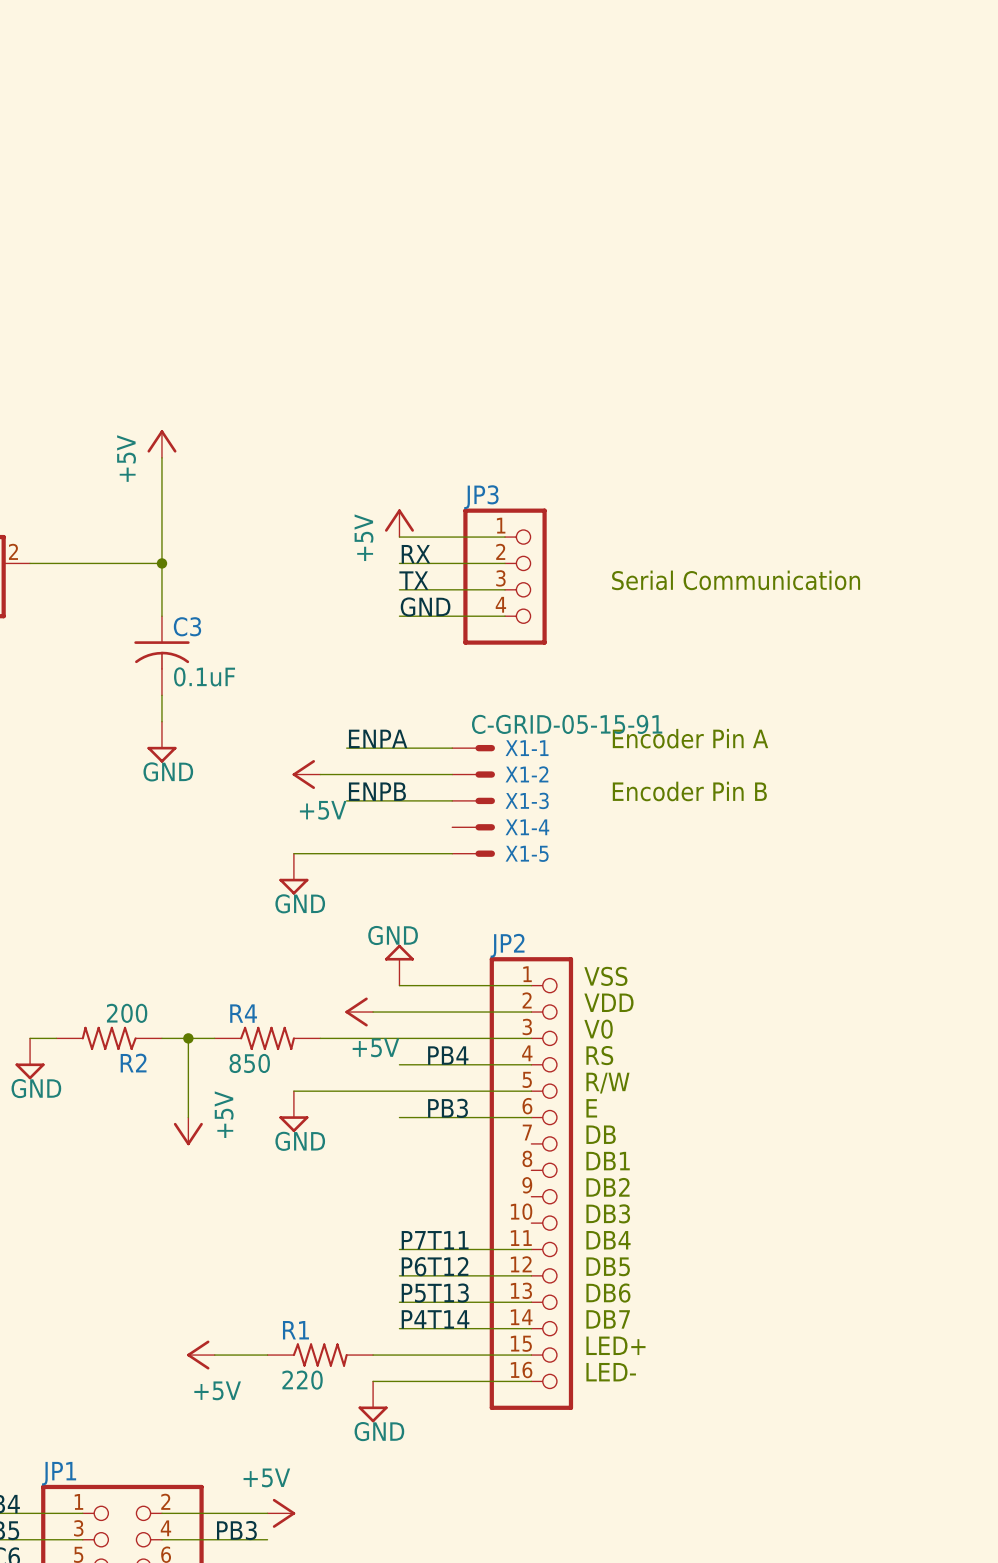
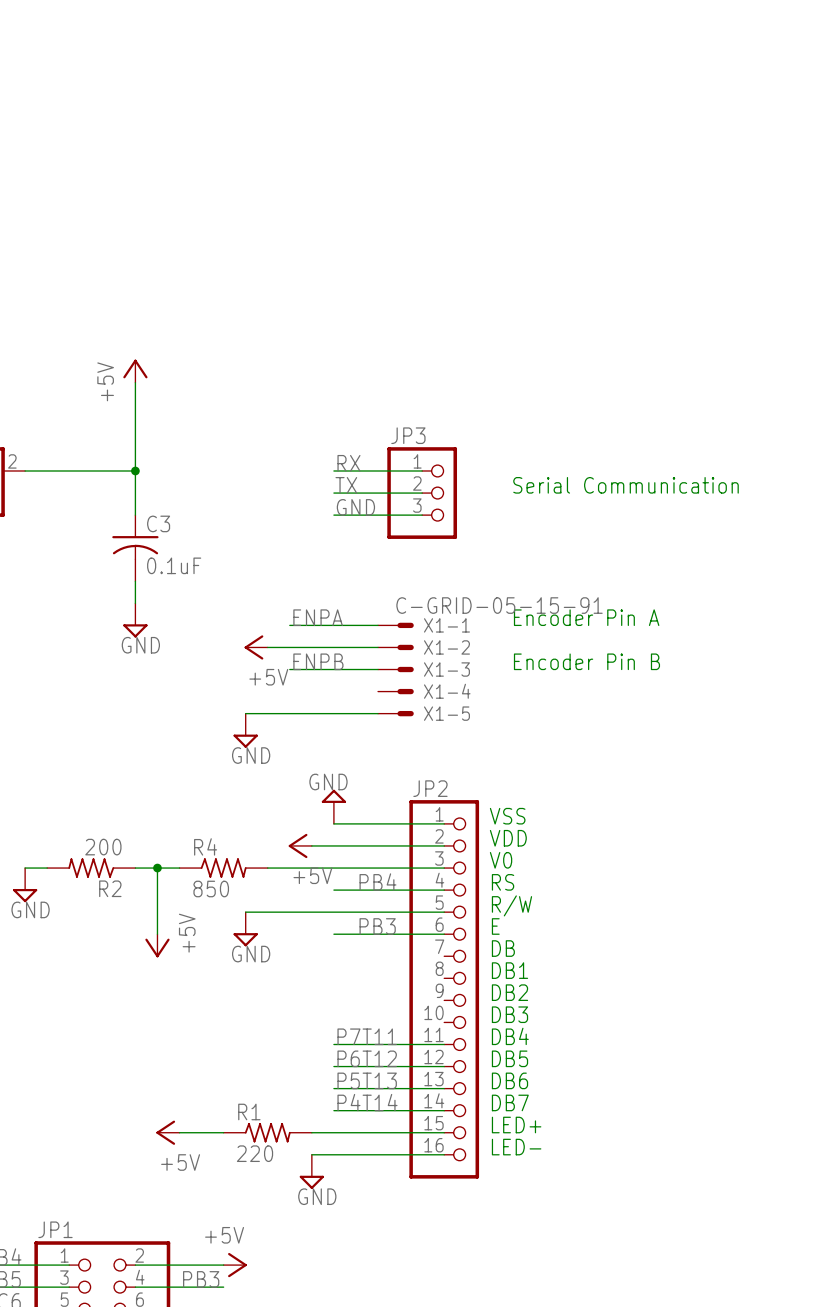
JP3 symbol: [463, 508, 547, 645] -> [387, 447, 458, 539]
power symbol: +5V (399, 523) -> none
wire: (399, 537) (505, 537) -> none

